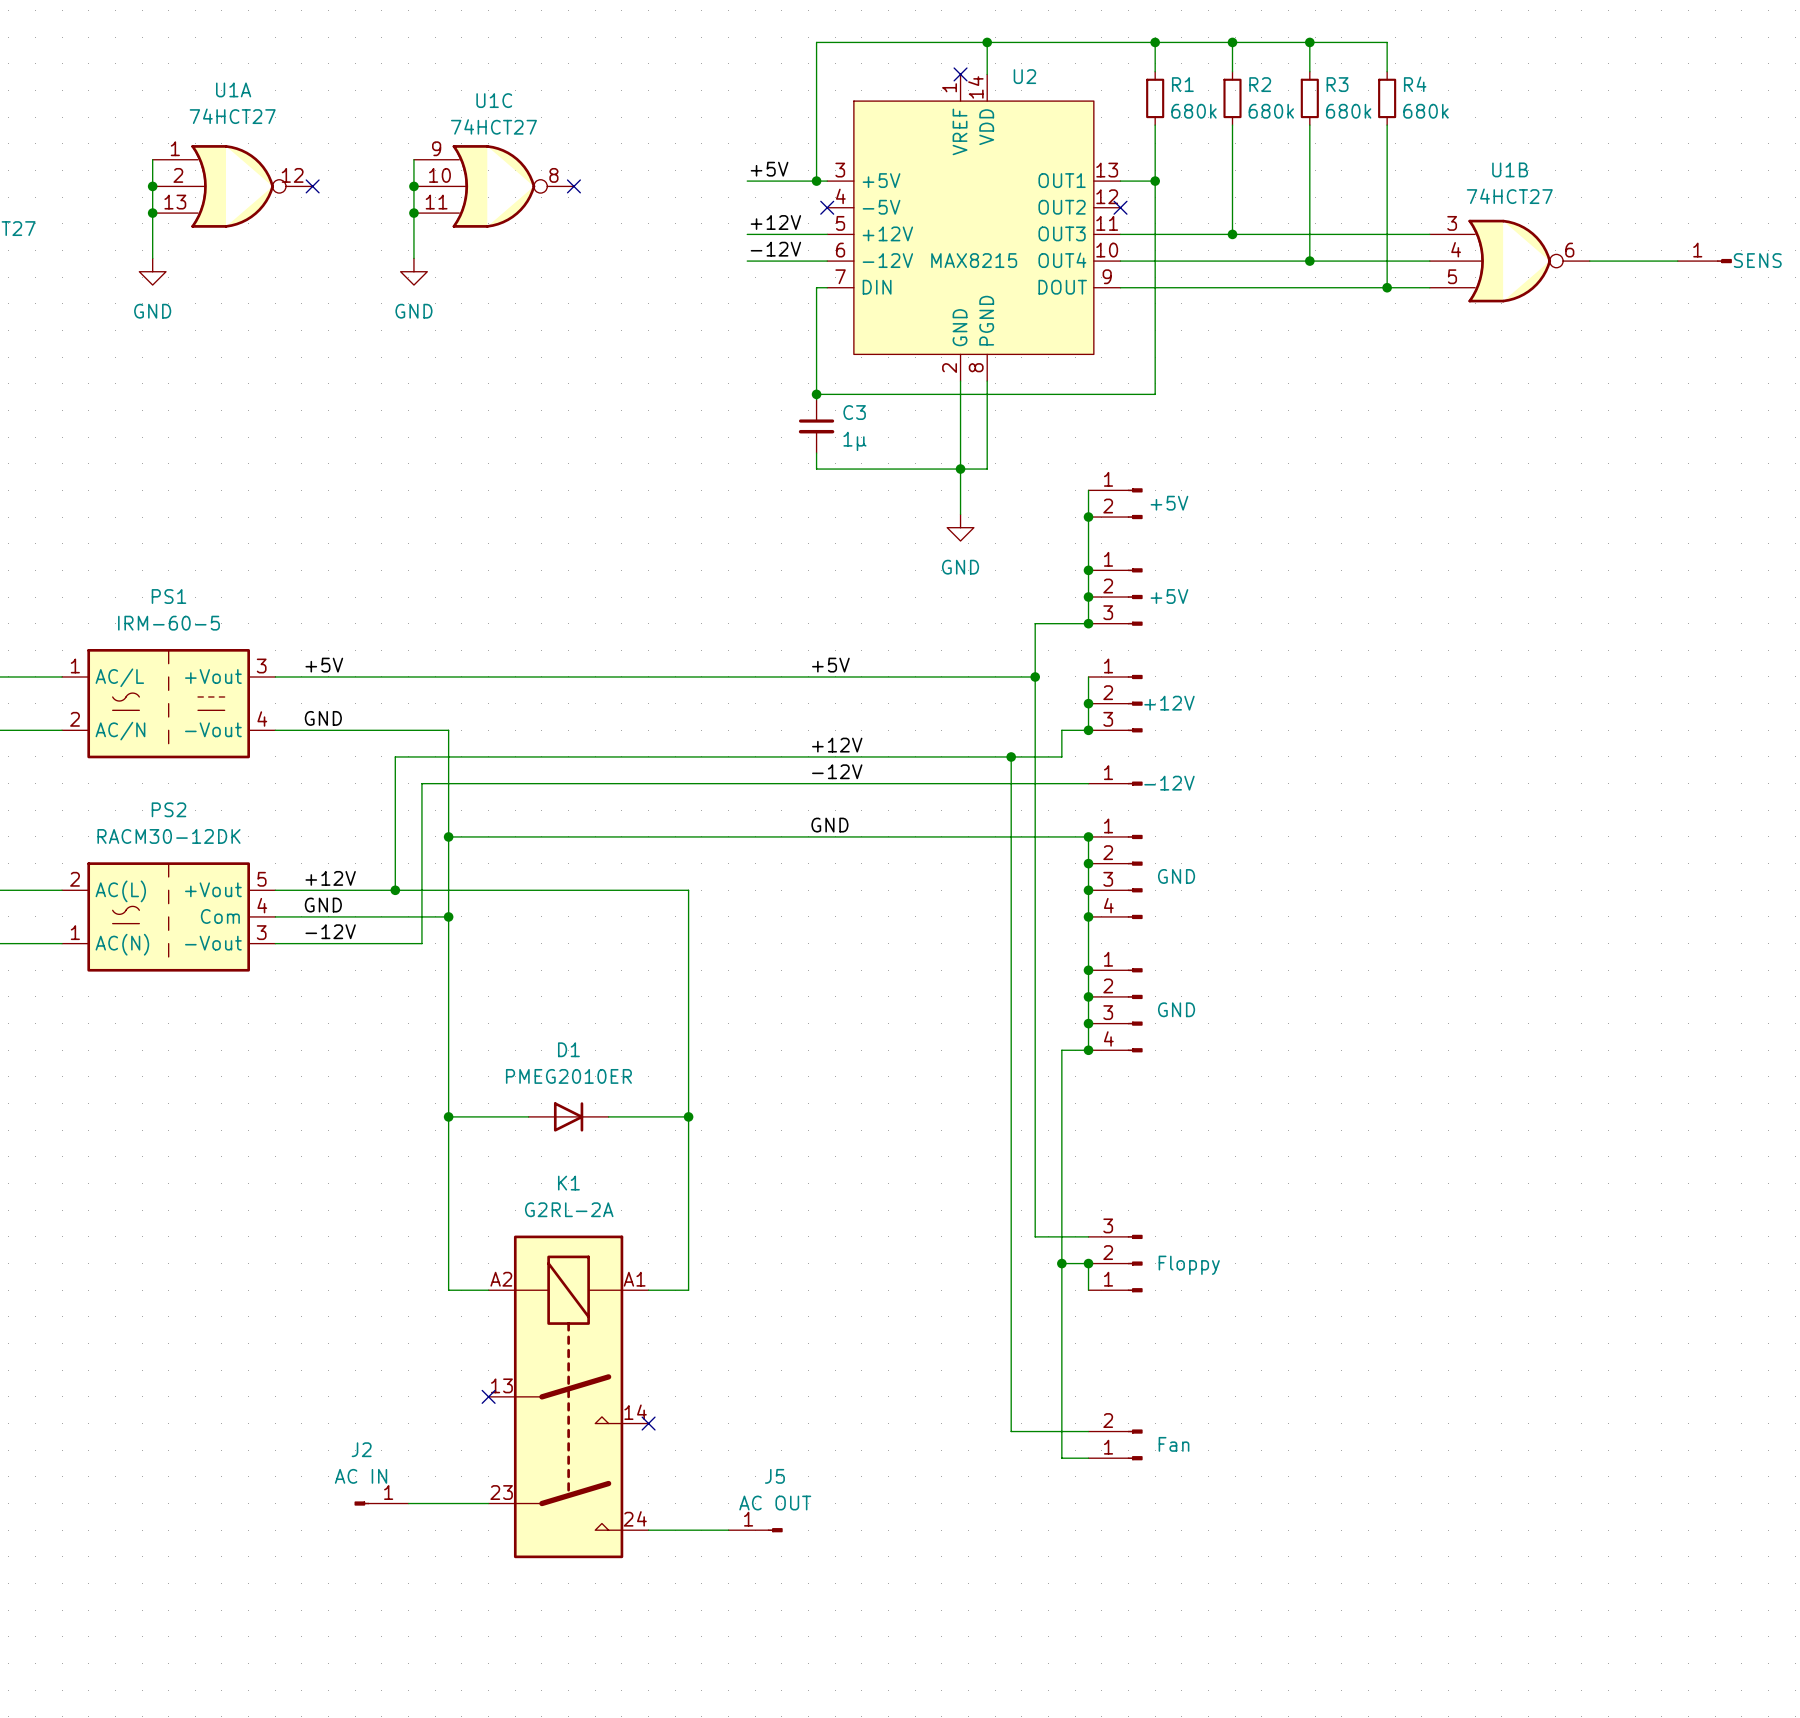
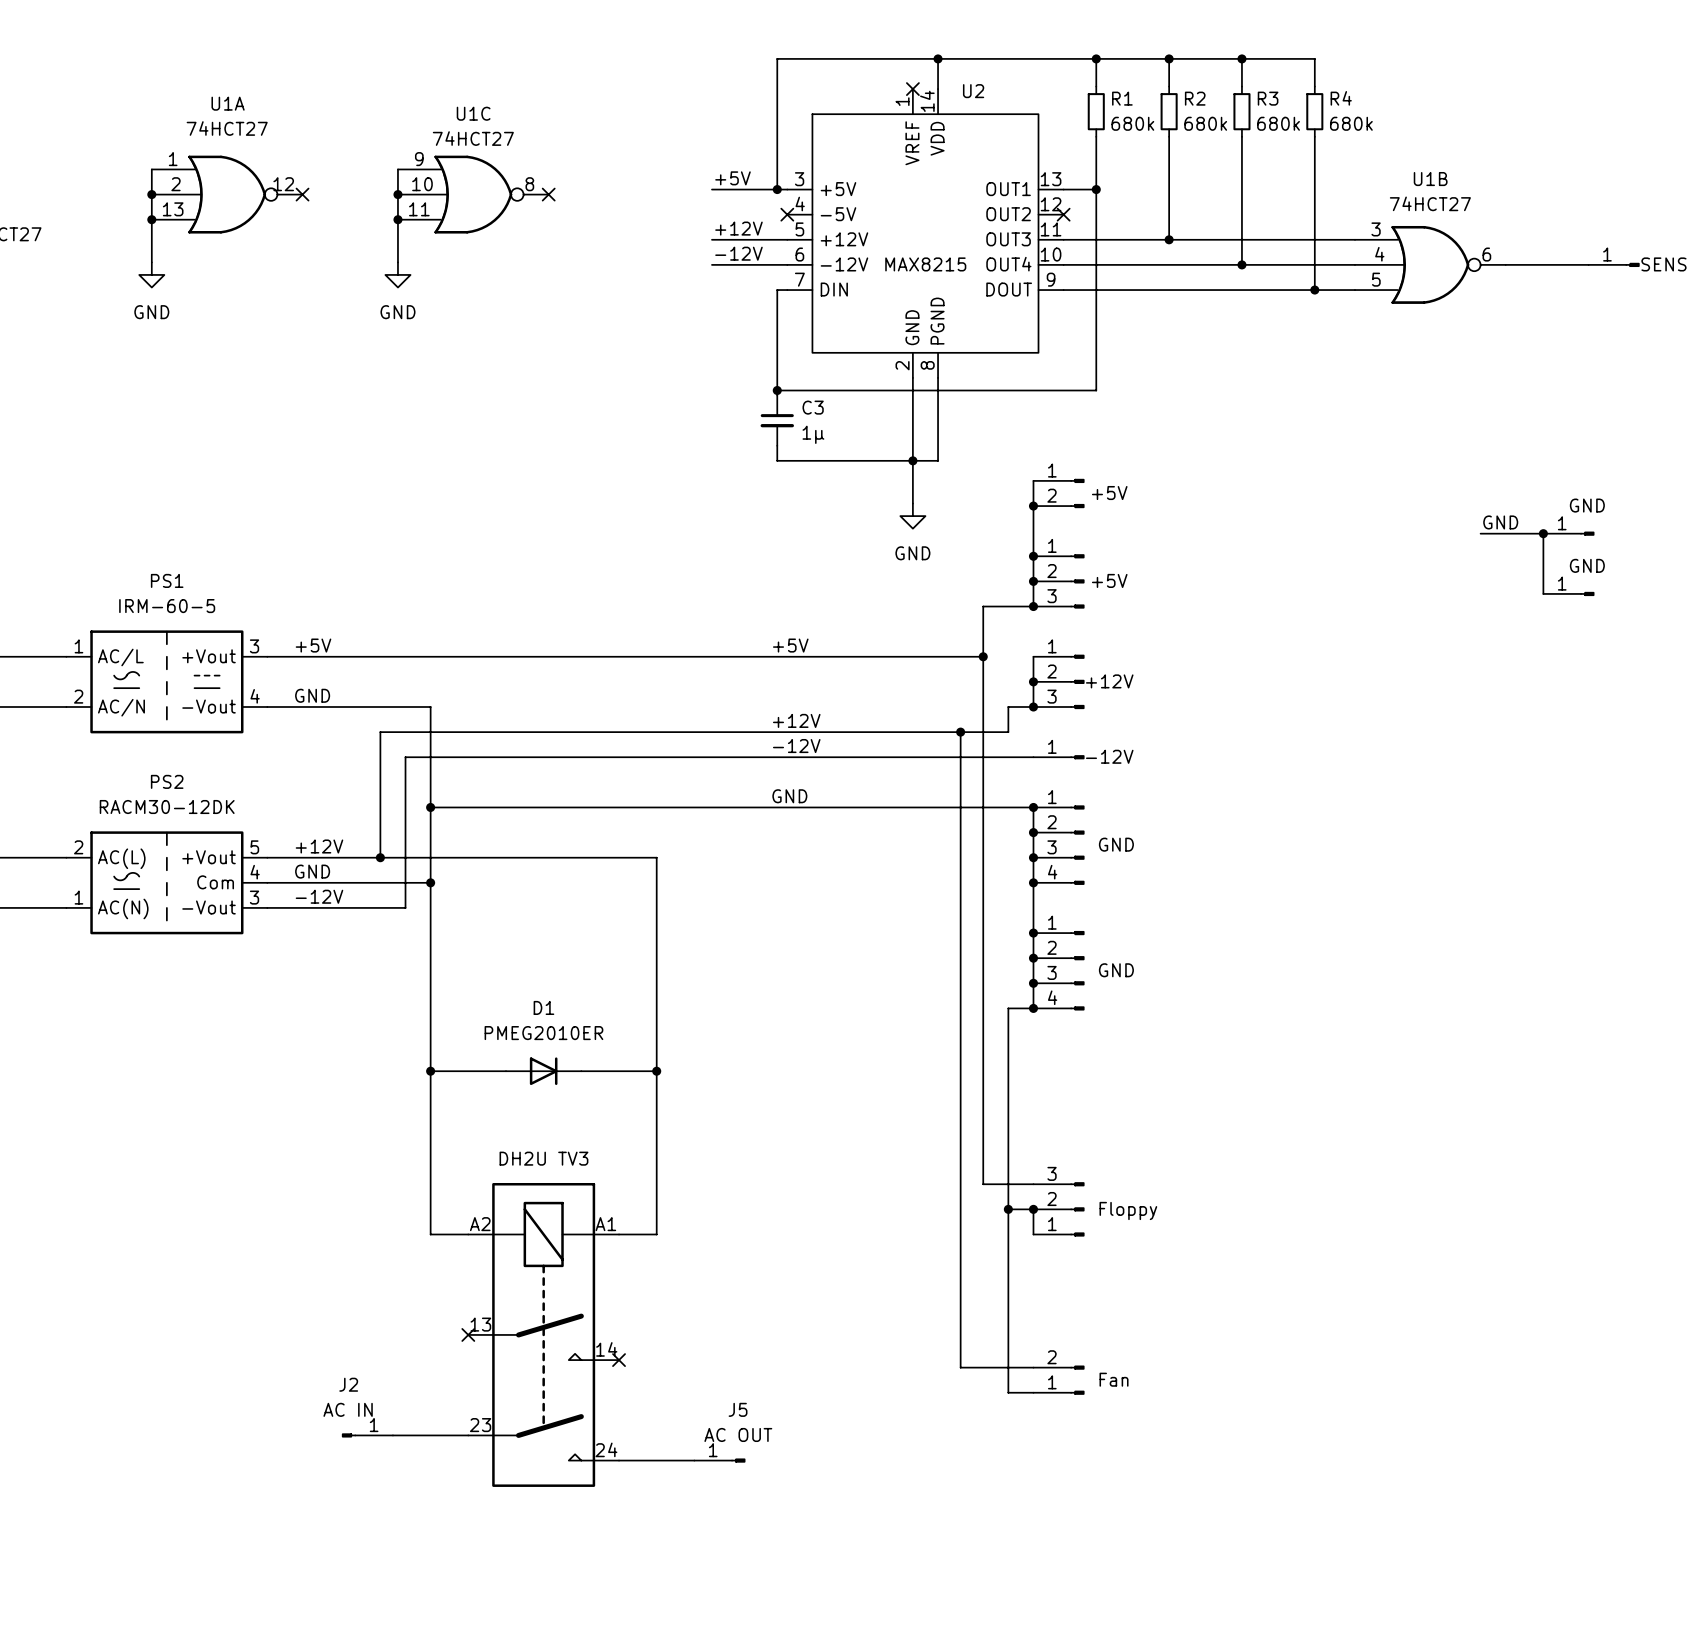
label: none -> GND (1500, 522)
wire: none -> (1480, 533) (1543, 533) (1543, 593)
junction: none -> (1543, 533)
part: none -> GND (1568, 533)
part: none -> GND (1568, 593)
K1 name: K1 (568, 1183) -> none
K1 value: G2RL-2A (569, 1209) -> DH2U TV3 (543, 1158)

